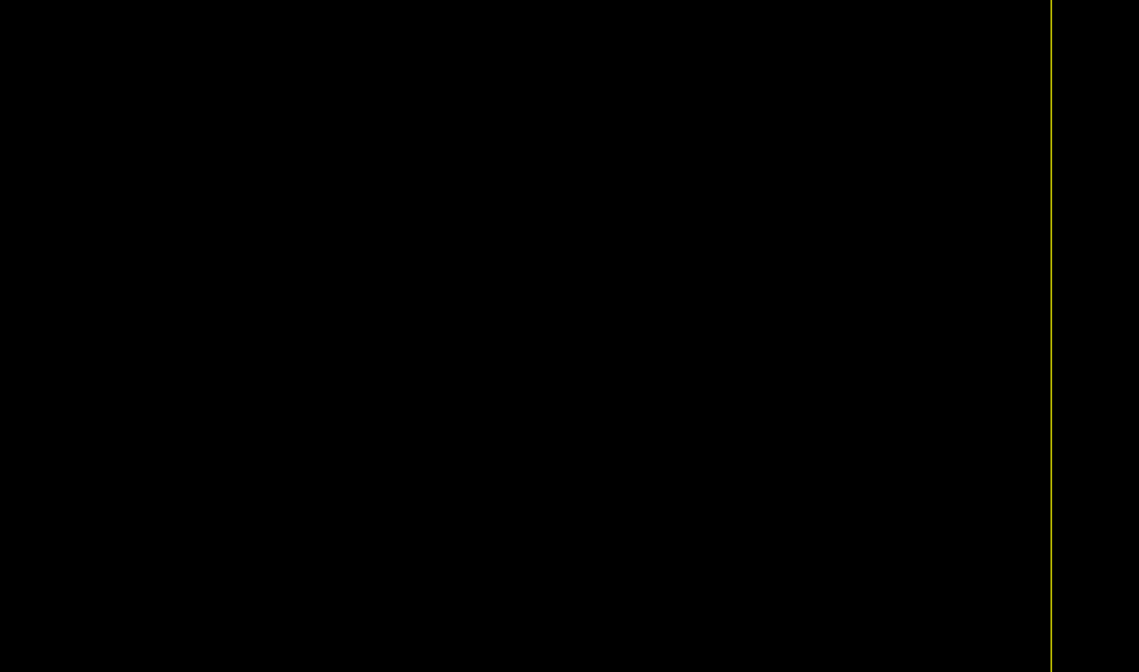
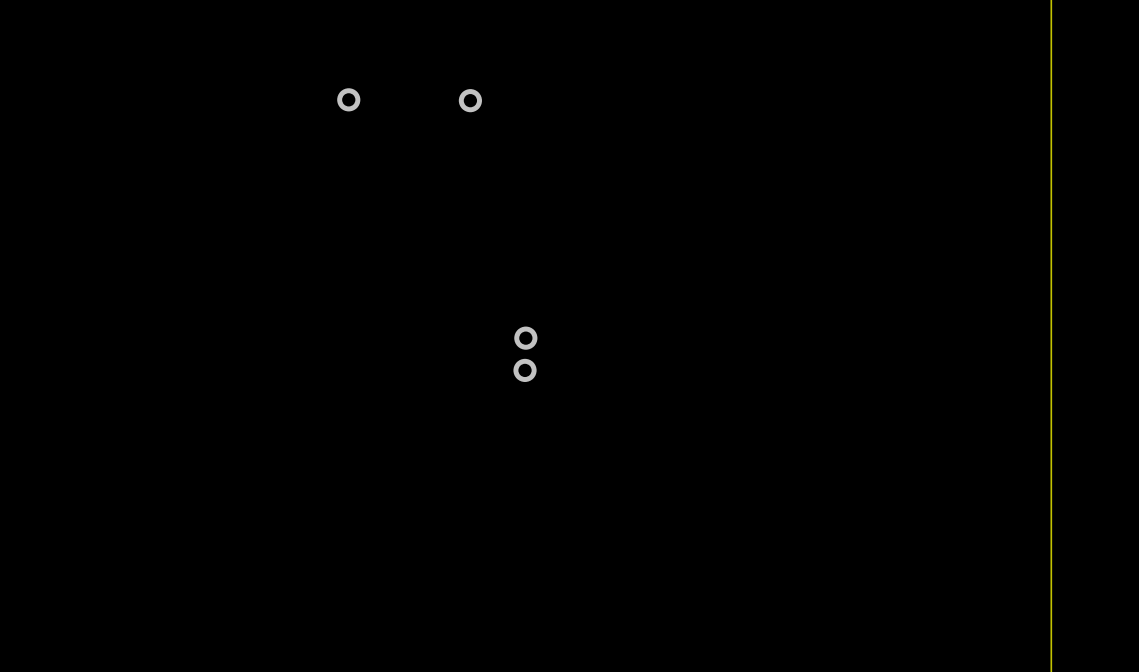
via: none -> (348, 99)
via: none -> (470, 100)
via: none -> (525, 338)
via: none -> (525, 370)

